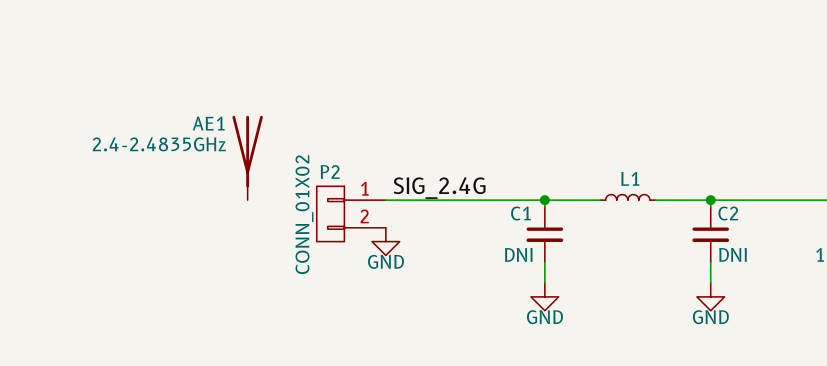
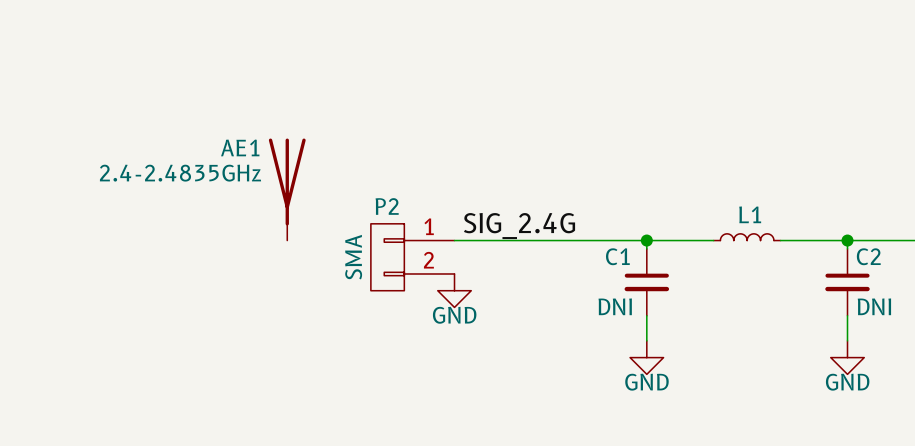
P2 value: CONN_01X02 (304, 214) -> SMA (353, 257)

